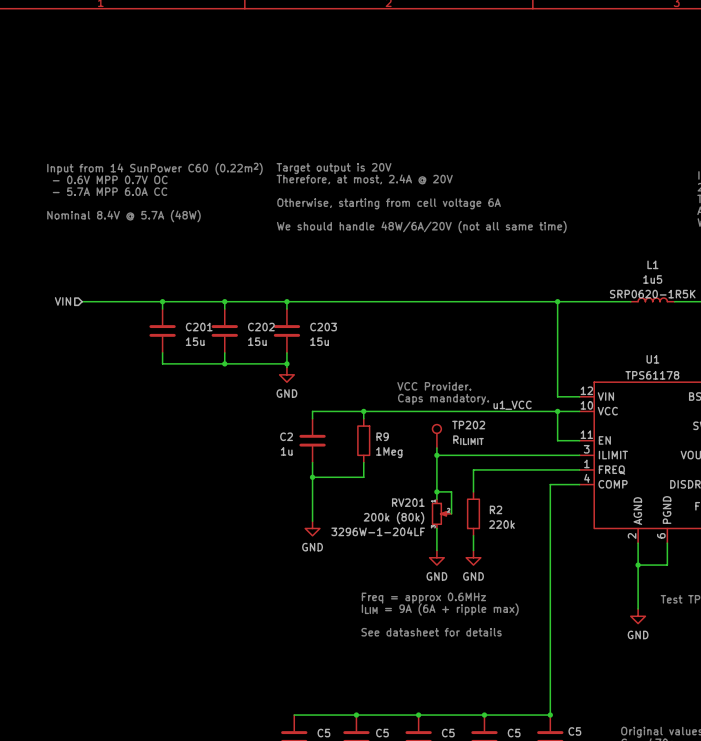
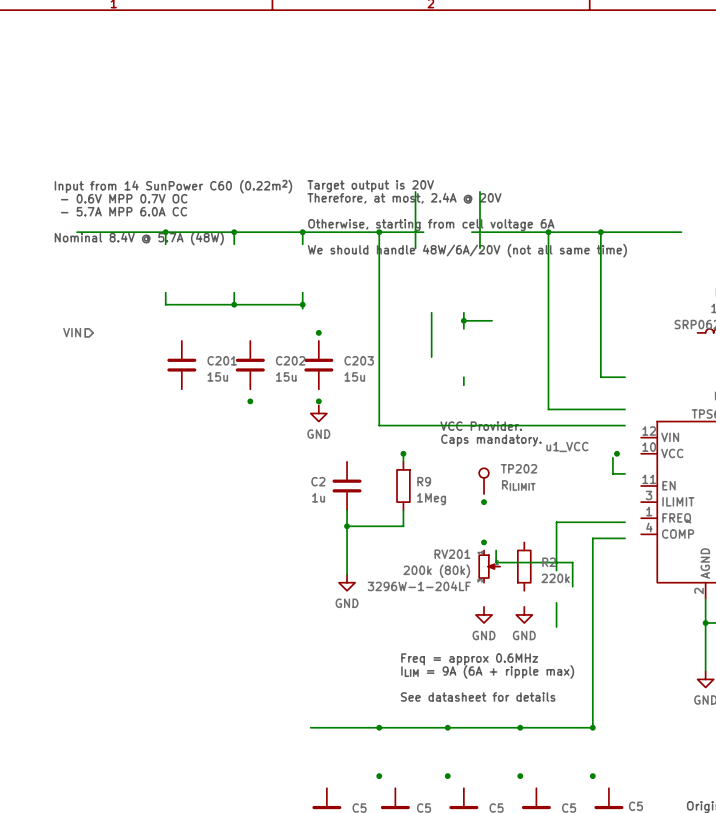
wire: none -> (415, 191) (415, 248)
wire: none -> (479, 191) (479, 248)
wire: none -> (77, 232) (423, 232)
wire: none -> (165, 232) (165, 244)
junction: none -> (165, 232)
wire: none -> (234, 232) (234, 244)
junction: none -> (234, 232)
wire: none -> (302, 232) (302, 244)
junction: none -> (302, 232)
wire: none -> (379, 232) (379, 425) (625, 425)
junction: none -> (379, 232)
wire: none -> (471, 232) (681, 232)
wire: none -> (548, 232) (548, 409) (625, 409)
junction: none -> (548, 232)
wire: none -> (600, 232) (600, 377) (625, 377)
junction: none -> (600, 232)
junction: none -> (234, 304)
junction: none -> (302, 304)
wire: none -> (431, 312) (431, 357)
wire: none -> (463, 312) (463, 328)
wire: none -> (463, 320) (492, 320)
junction: none -> (463, 320)
wire: (82, 301) (630, 301) -> none
wire: (162, 301) (162, 309) -> none
junction: (162, 301) -> none
wire: (224, 301) (224, 309) -> none
junction: (224, 301) -> none
wire: (286, 301) (286, 309) -> (463, 377) (463, 385)
wire: (557, 301) (557, 396) (579, 396) -> none
junction: (557, 301) -> none
wire: (162, 352) (162, 363) (286, 363) -> (165, 292) (165, 304) (302, 304)
wire: (224, 352) (224, 363) -> (234, 292) (234, 304)
wire: (286, 352) (286, 367) -> (302, 292) (302, 308)
wire: (557, 411) (557, 440) (579, 440) -> none
wire: (579, 411) (312, 411) (312, 418) -> none
wire: none -> (612, 457) (612, 473) (625, 473)
wire: (436, 448) (436, 499) -> none
wire: (436, 455) (579, 455) -> none
wire: (579, 469) (473, 469) (473, 491) -> none
wire: none -> (625, 522) (556, 522) (556, 570)
wire: (579, 484) (550, 484) (550, 715) (294, 715) -> none
wire: none -> (625, 538) (592, 538) (592, 727) (310, 727)
wire: (436, 491) (451, 491) (451, 513) -> none
wire: none -> (496, 550) (496, 562) (572, 562) (572, 586)
wire: (436, 528) (436, 550) -> (556, 602) (556, 627)
wire: (473, 535) (473, 550) -> none
junction: none -> (379, 727)
junction: none -> (447, 727)
junction: none -> (520, 727)
junction: none -> (592, 727)
junction position: (356, 715) -> (379, 776)
junction position: (418, 715) -> (447, 776)
junction position: (484, 715) -> (520, 776)
junction position: (550, 715) -> (592, 776)

